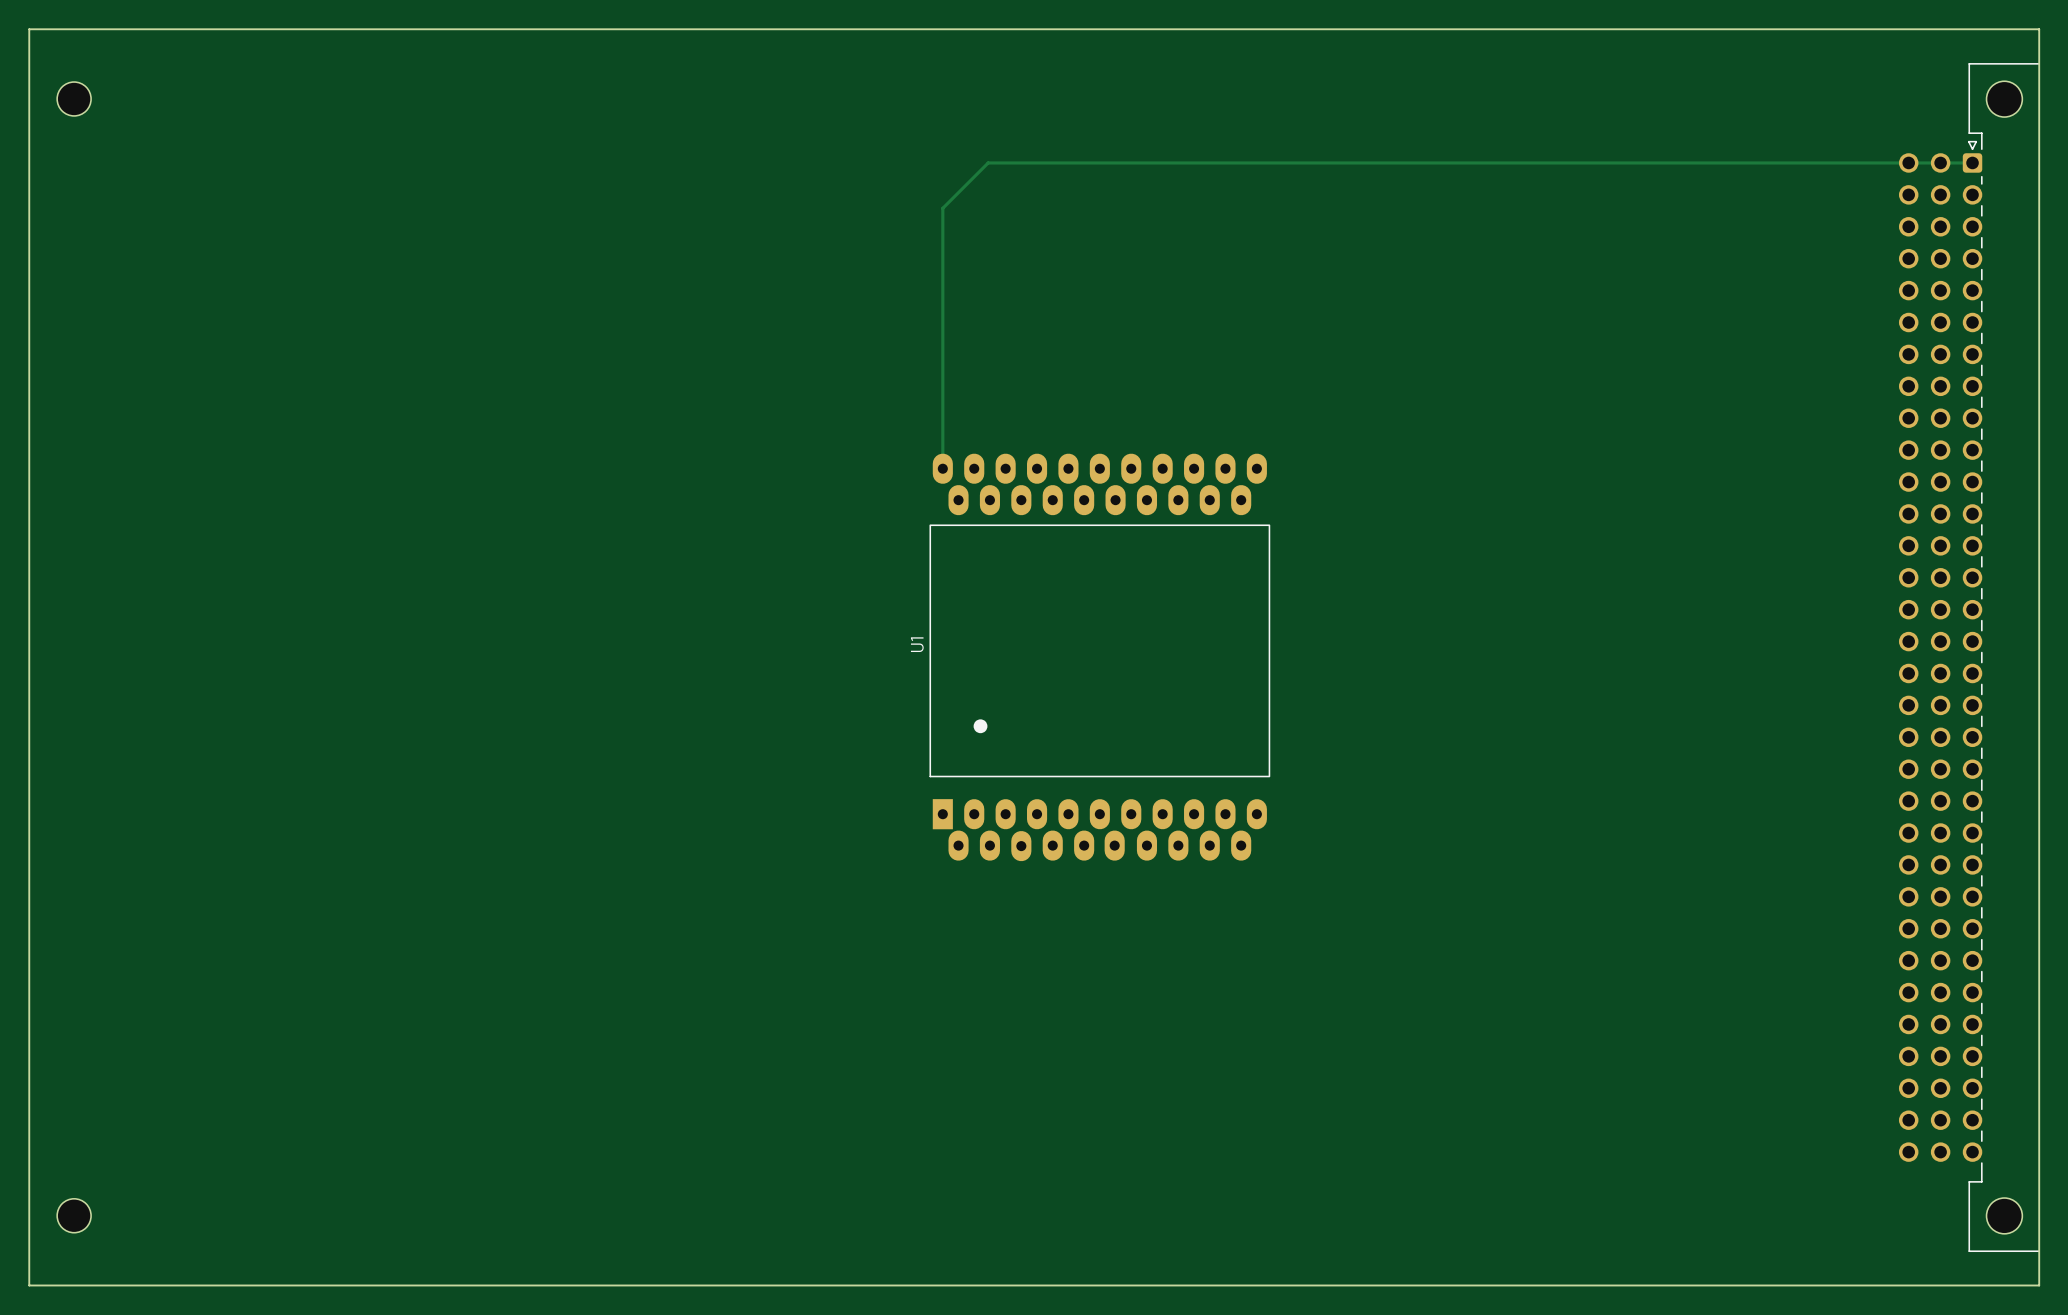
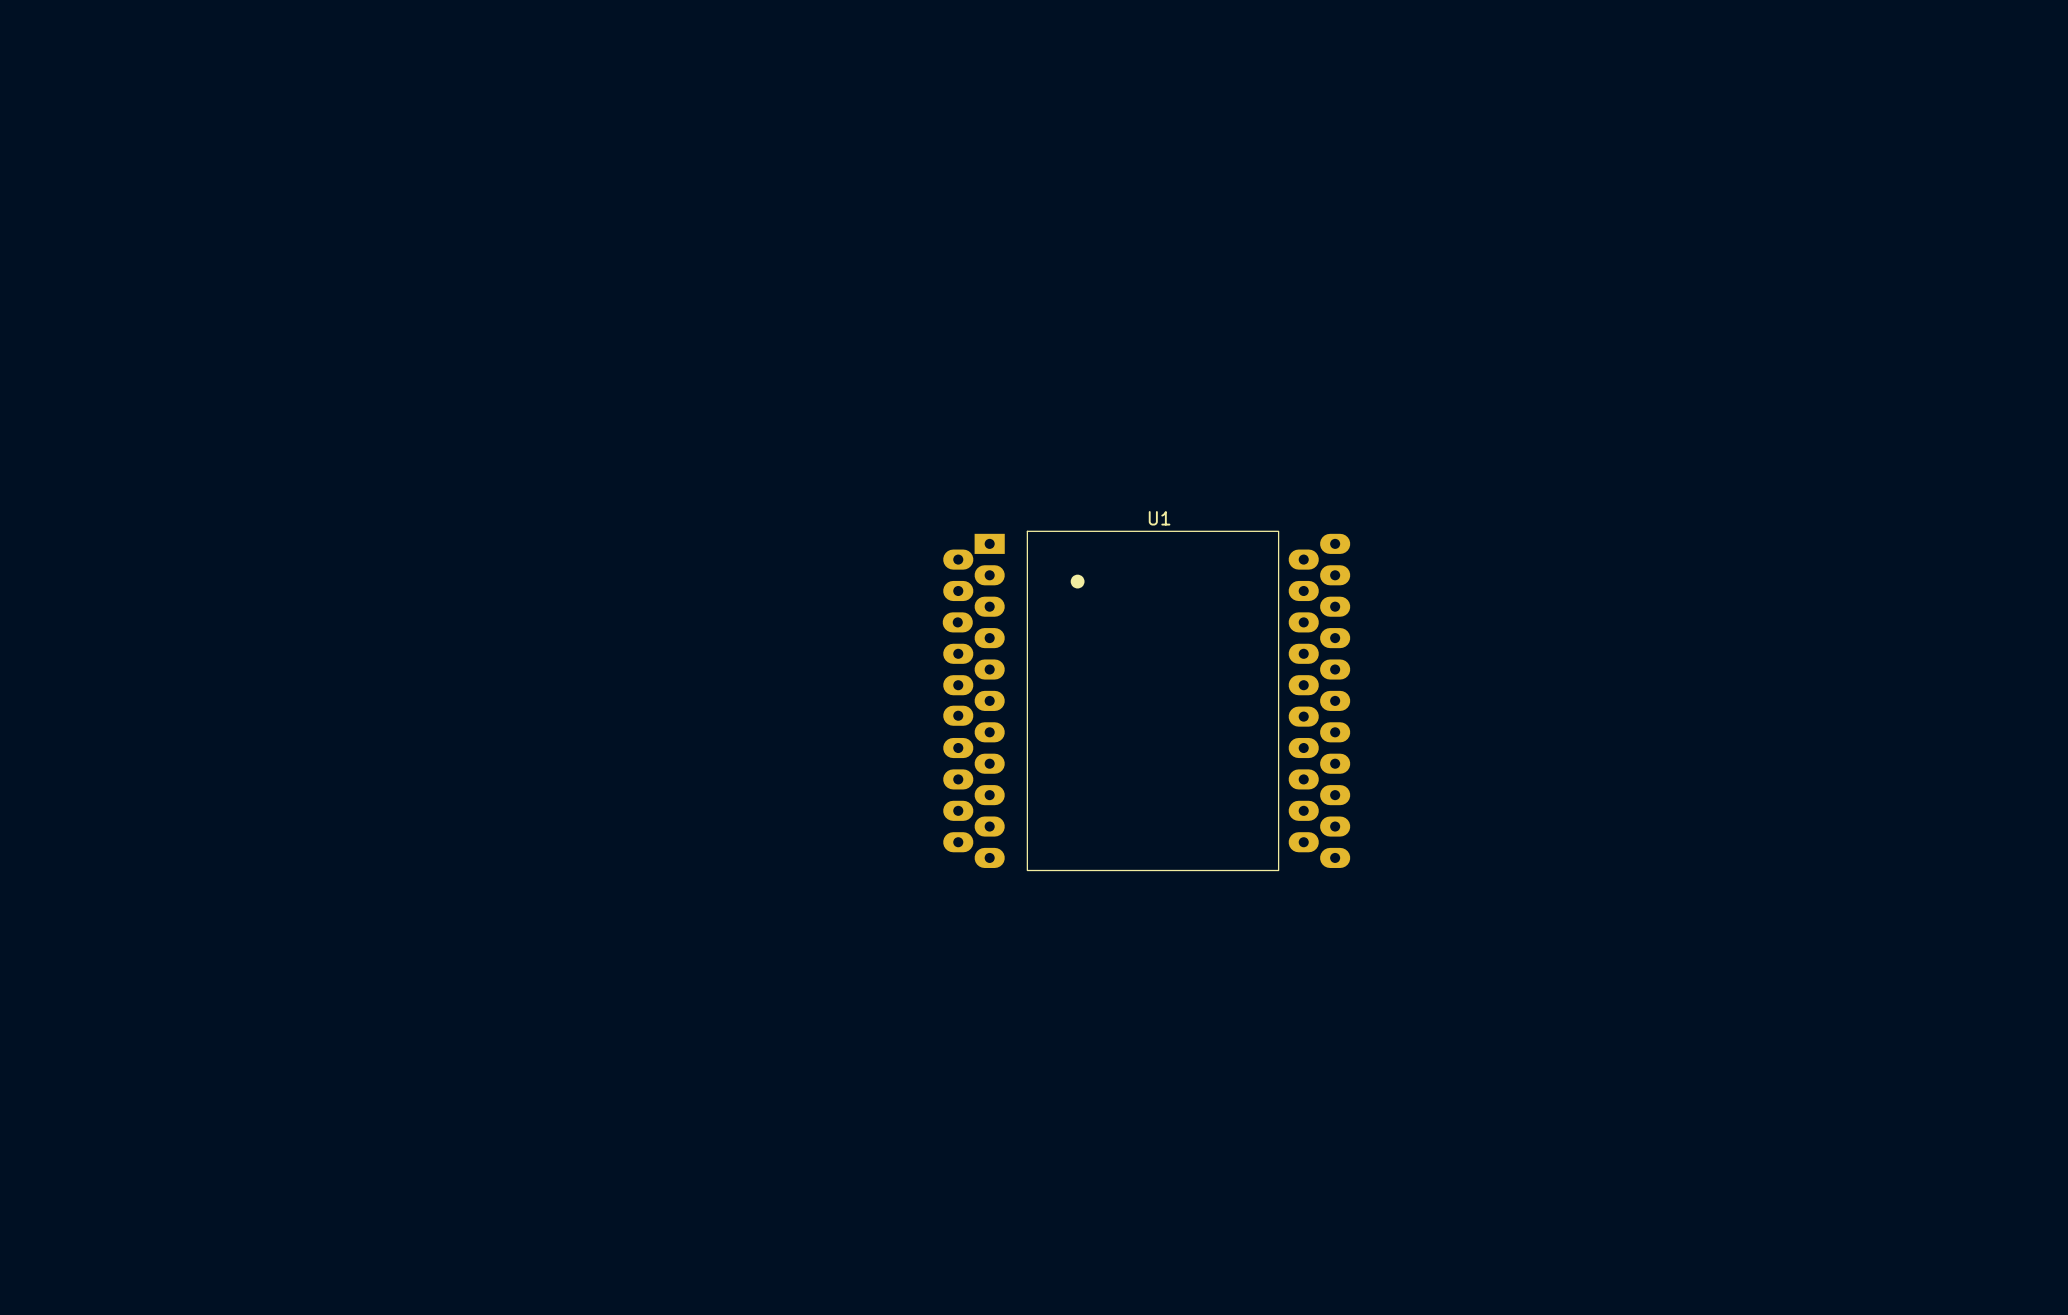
board edge: (29, 29) (2039, 29) (2039, 1285) (29, 1285) (29, 29) -> none
part: (74, 98) -> none
track: (1972, 162) (988, 162) (942, 208) (942, 468) -> none
U1 rotation: 0° (1099, 657) -> 90° clockwise (1146, 700)
part: (1969, 657) -> none
part: (74, 1215) -> none

